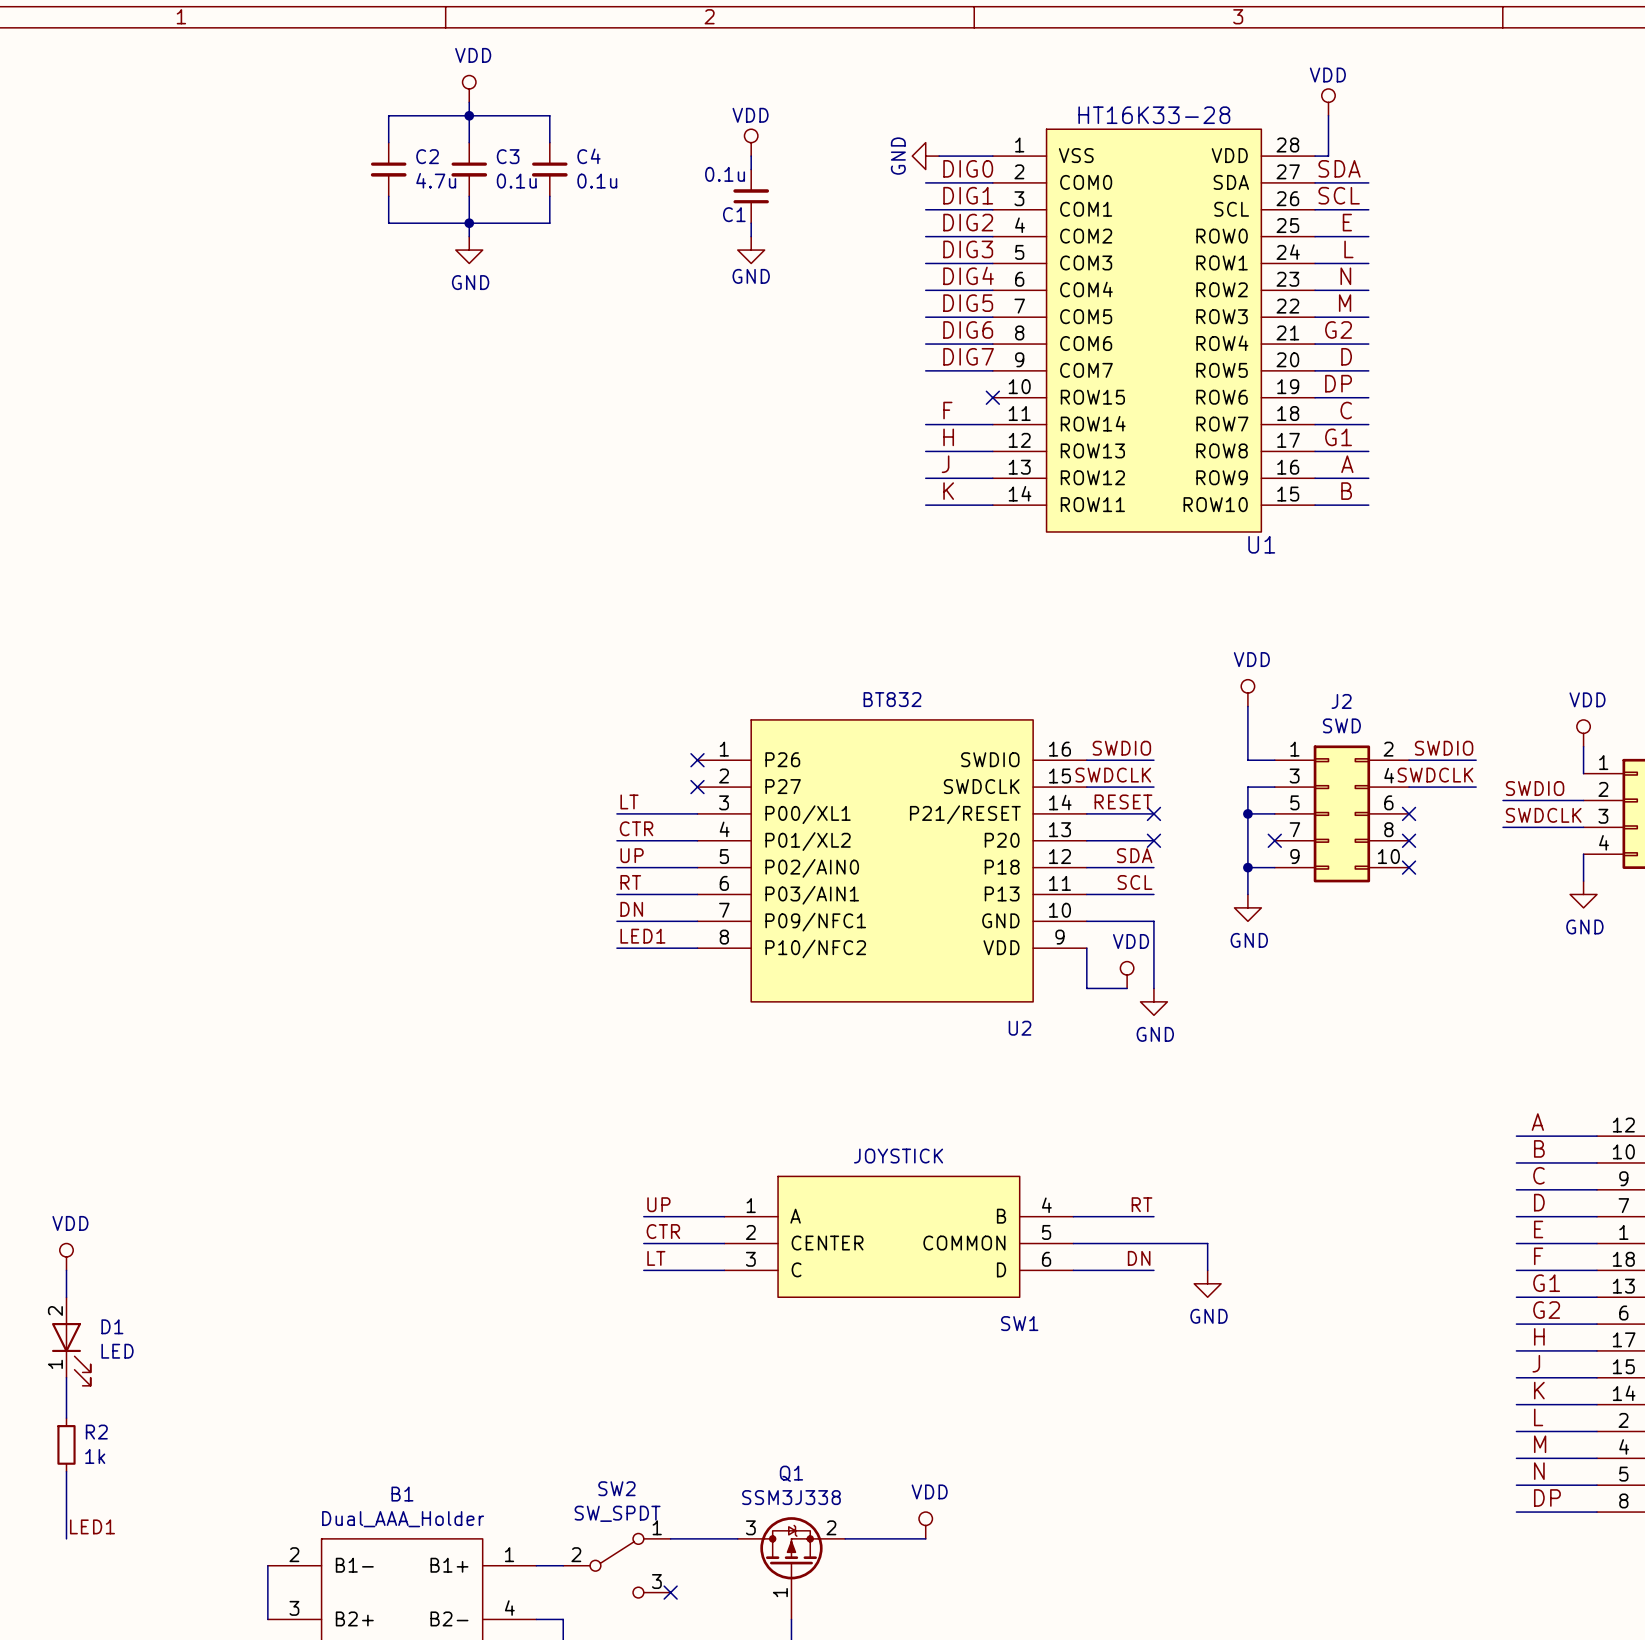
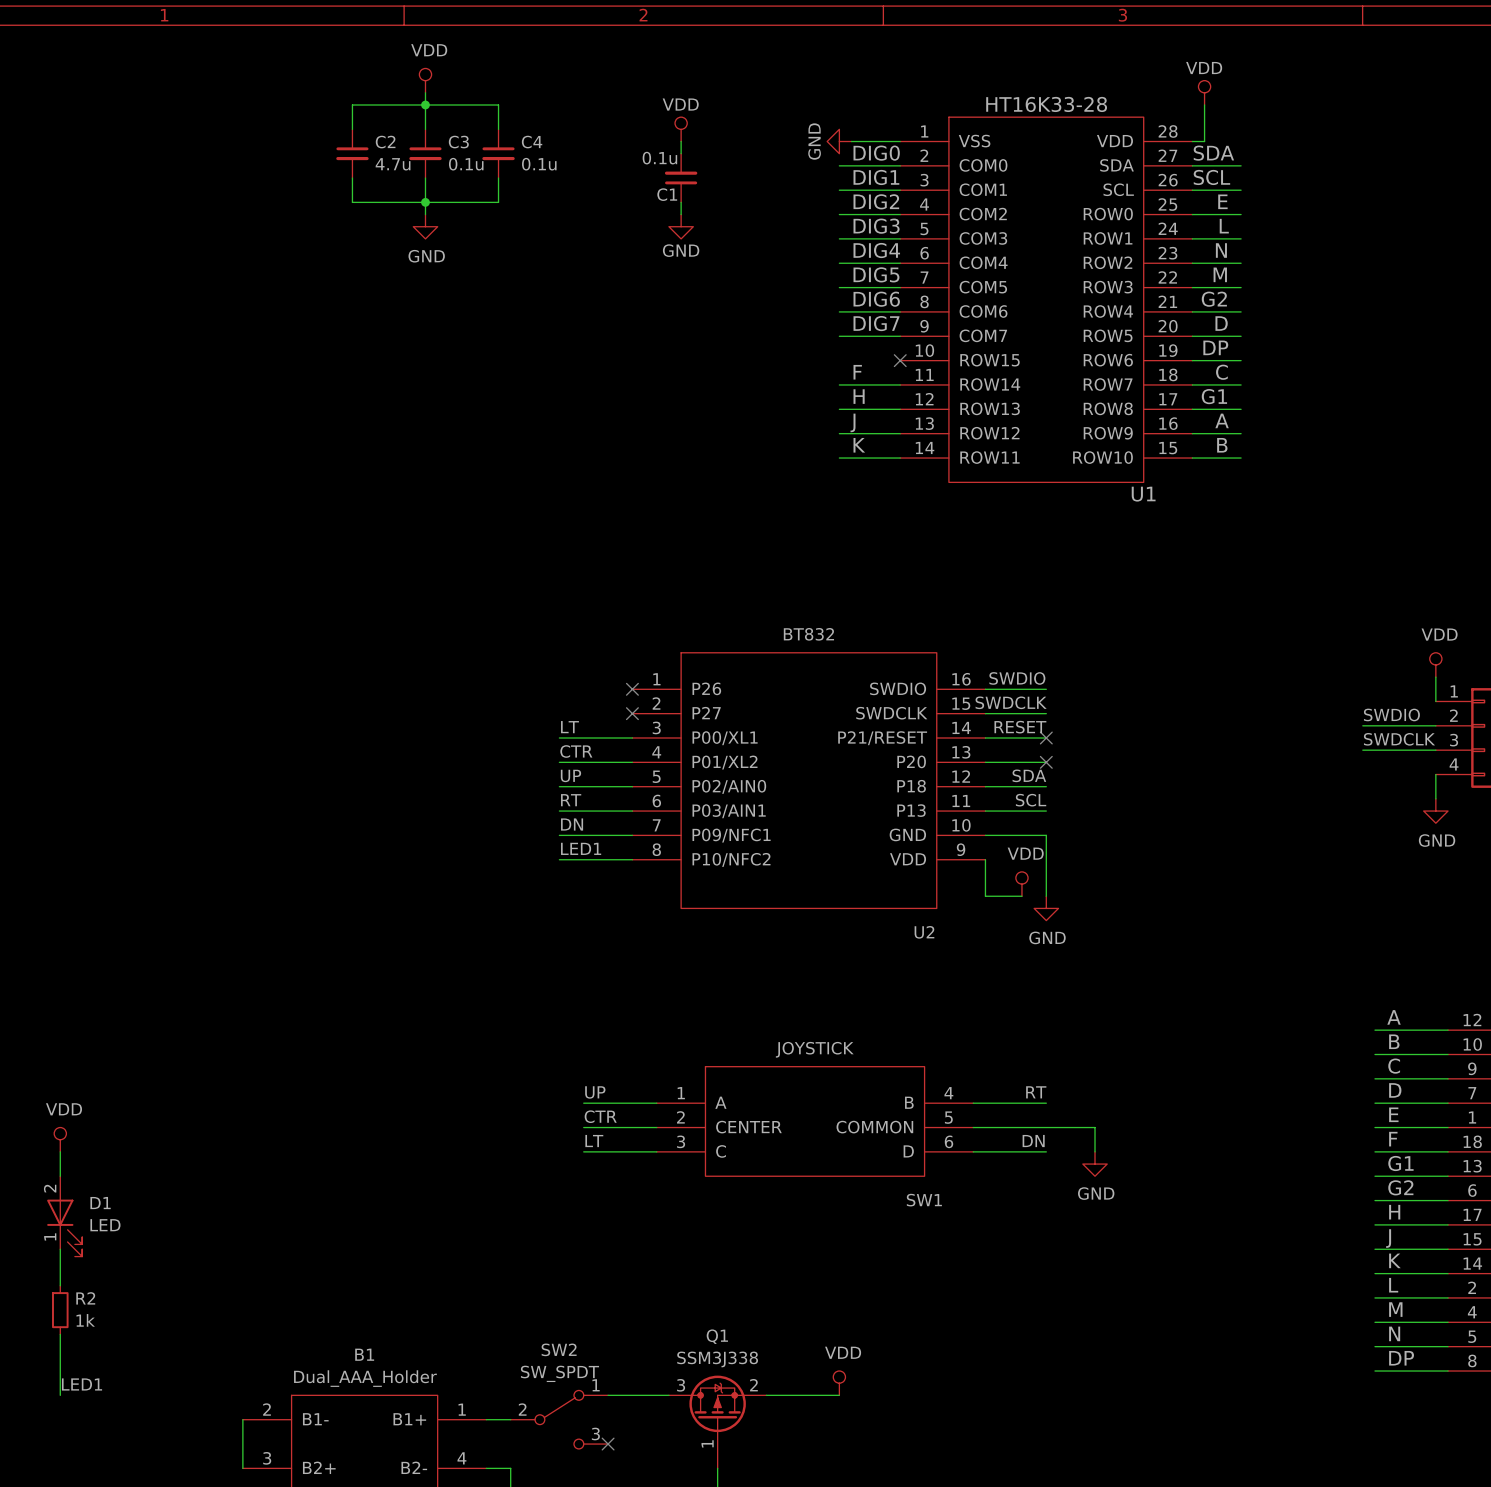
power symbol: VDD (1247, 693) -> none
wire: (1247, 706) (1247, 760) (1274, 760) -> none
label: SWDIO (1444, 748) -> none
wire: (1409, 760) (1476, 760) -> none
label: SWDCLK (1435, 775) -> none
wire: (1274, 787) (1247, 787) (1247, 894) -> none
wire: (1409, 787) (1476, 787) -> none
wire: (1247, 813) (1274, 813) -> none
junction: (1247, 813) -> none
J2: SWD (1341, 813) -> none
no-connect mark: (1409, 813) -> none
no-connect mark: (1274, 840) -> none
no-connect mark: (1409, 840) -> none
wire: (1247, 867) (1274, 867) -> none
junction: (1247, 867) -> none
no-connect mark: (1409, 867) -> none
power symbol: GND (1247, 907) -> none

